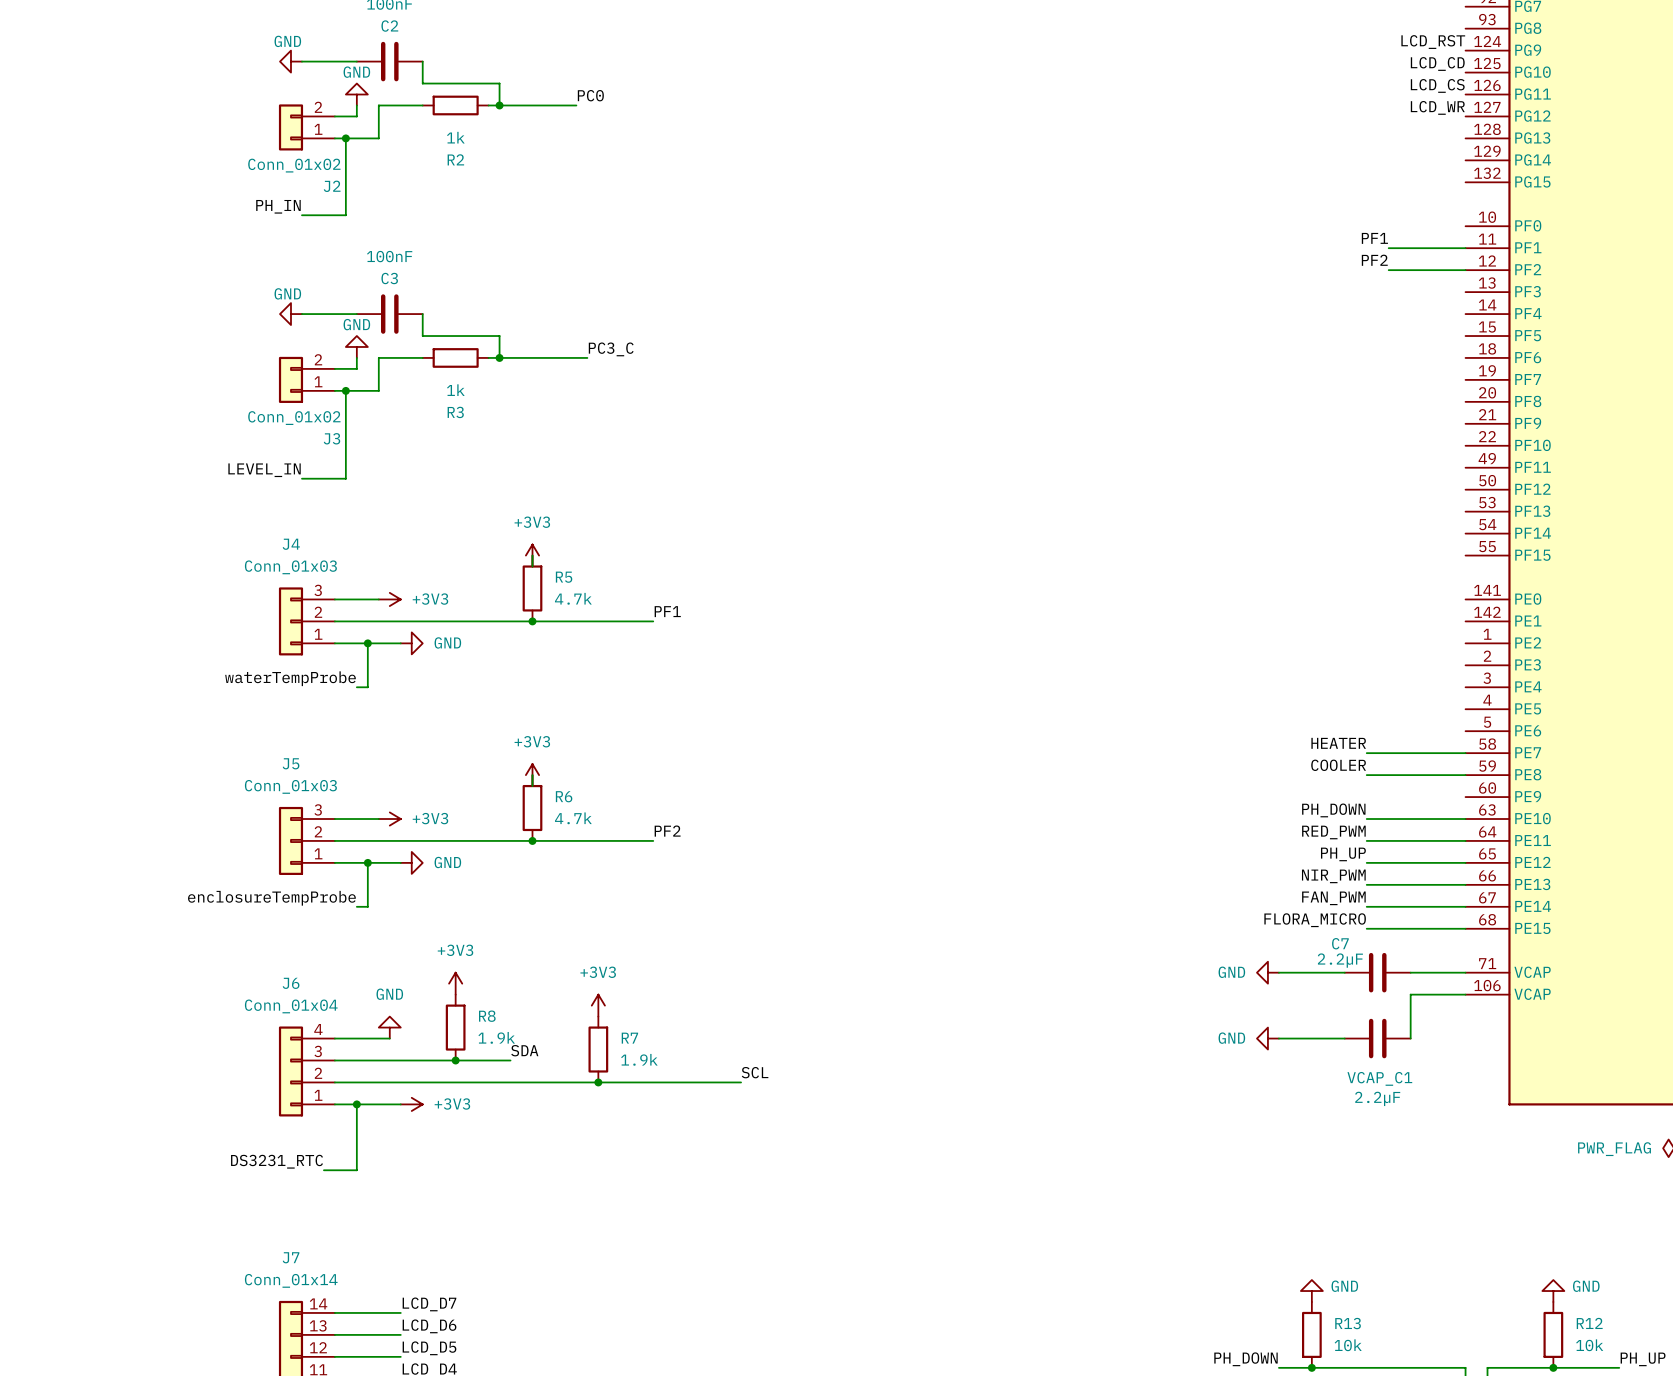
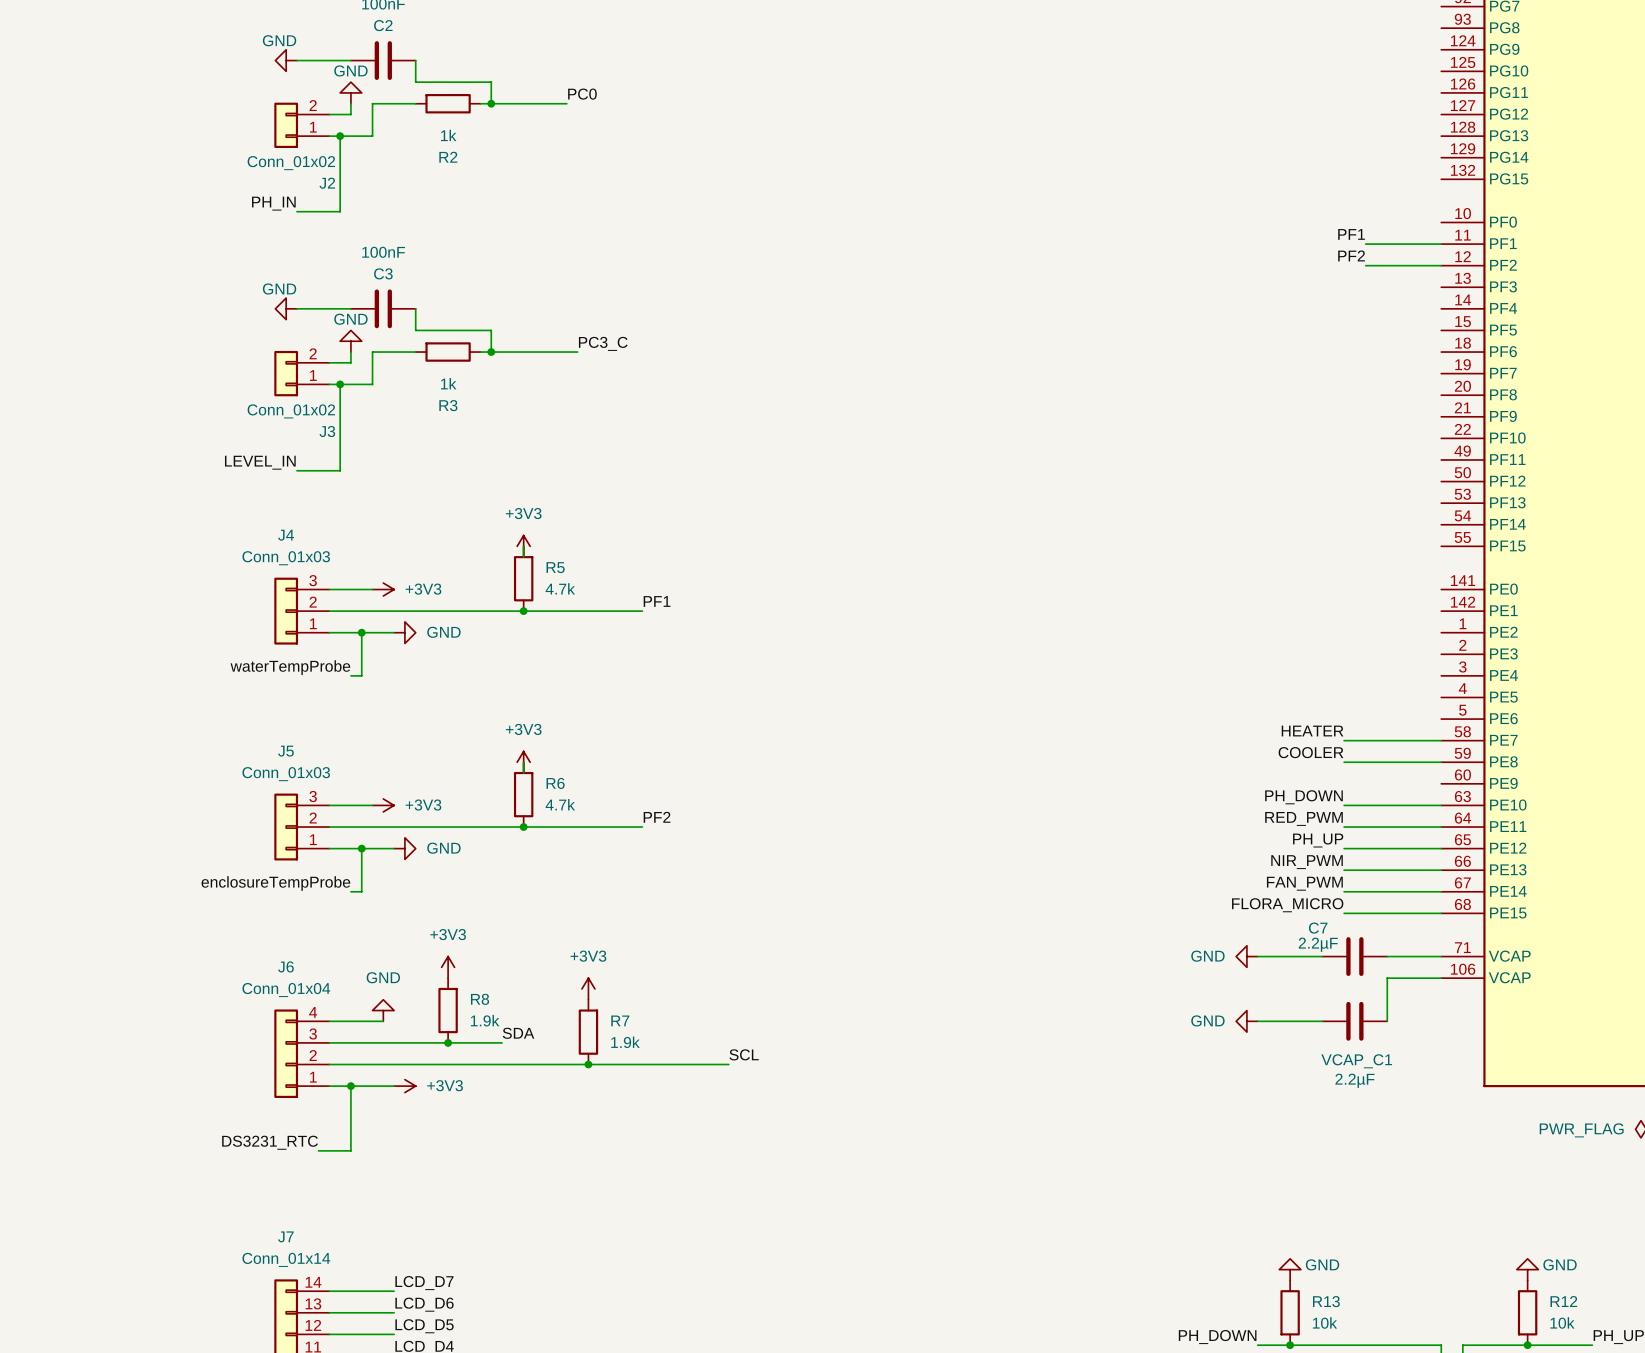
label: LCD_RST (1433, 42) -> none
label: LCD_CD (1437, 63) -> none
label: LCD_CS (1437, 85) -> none
label: LCD_WR (1437, 107) -> none

